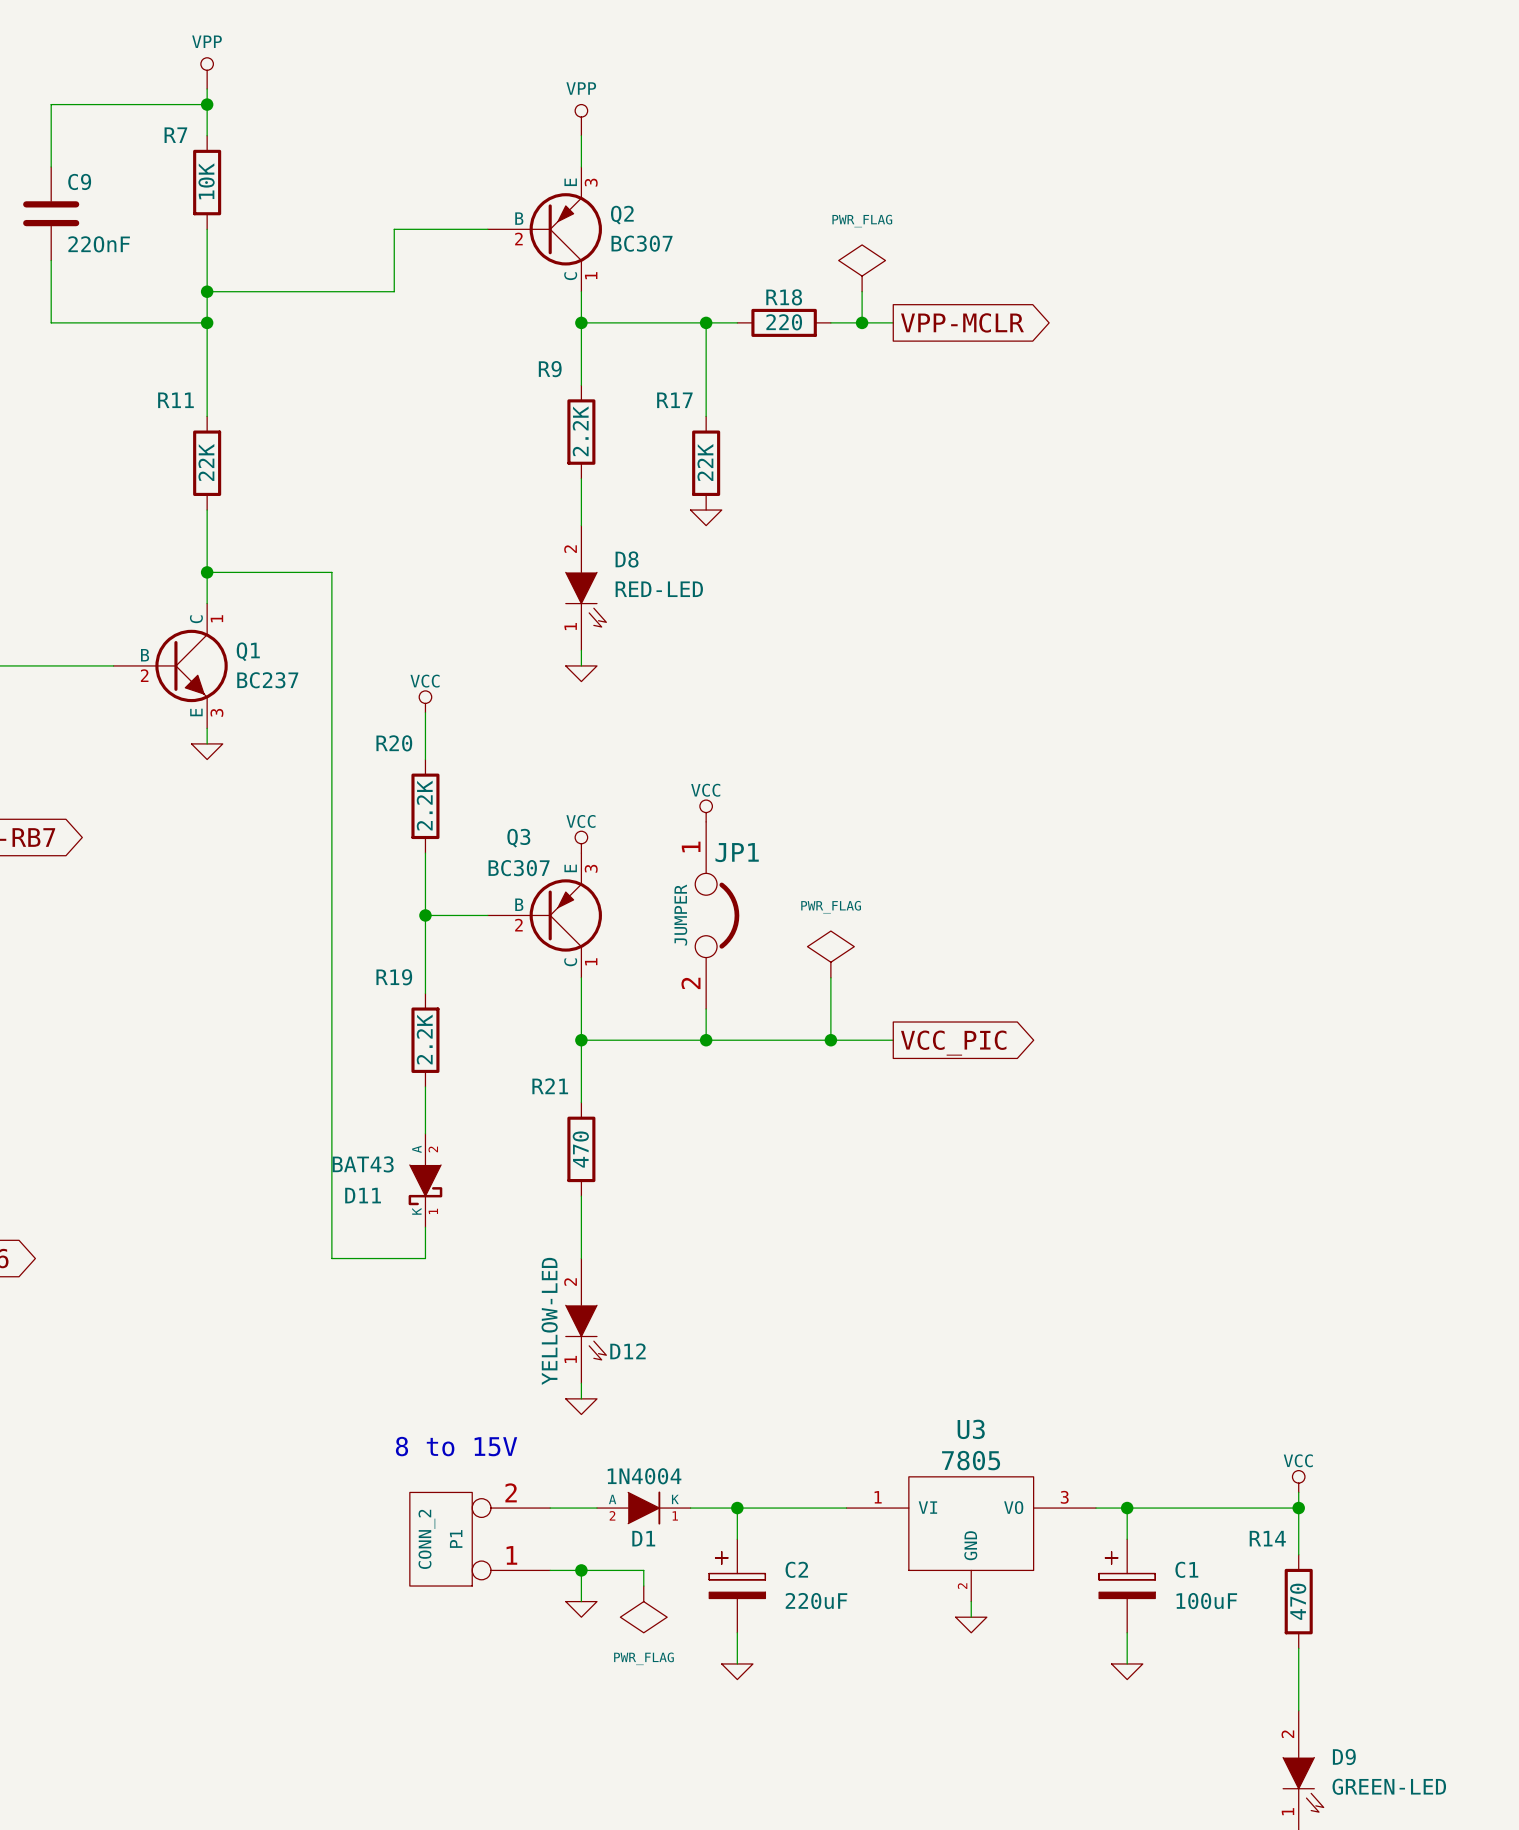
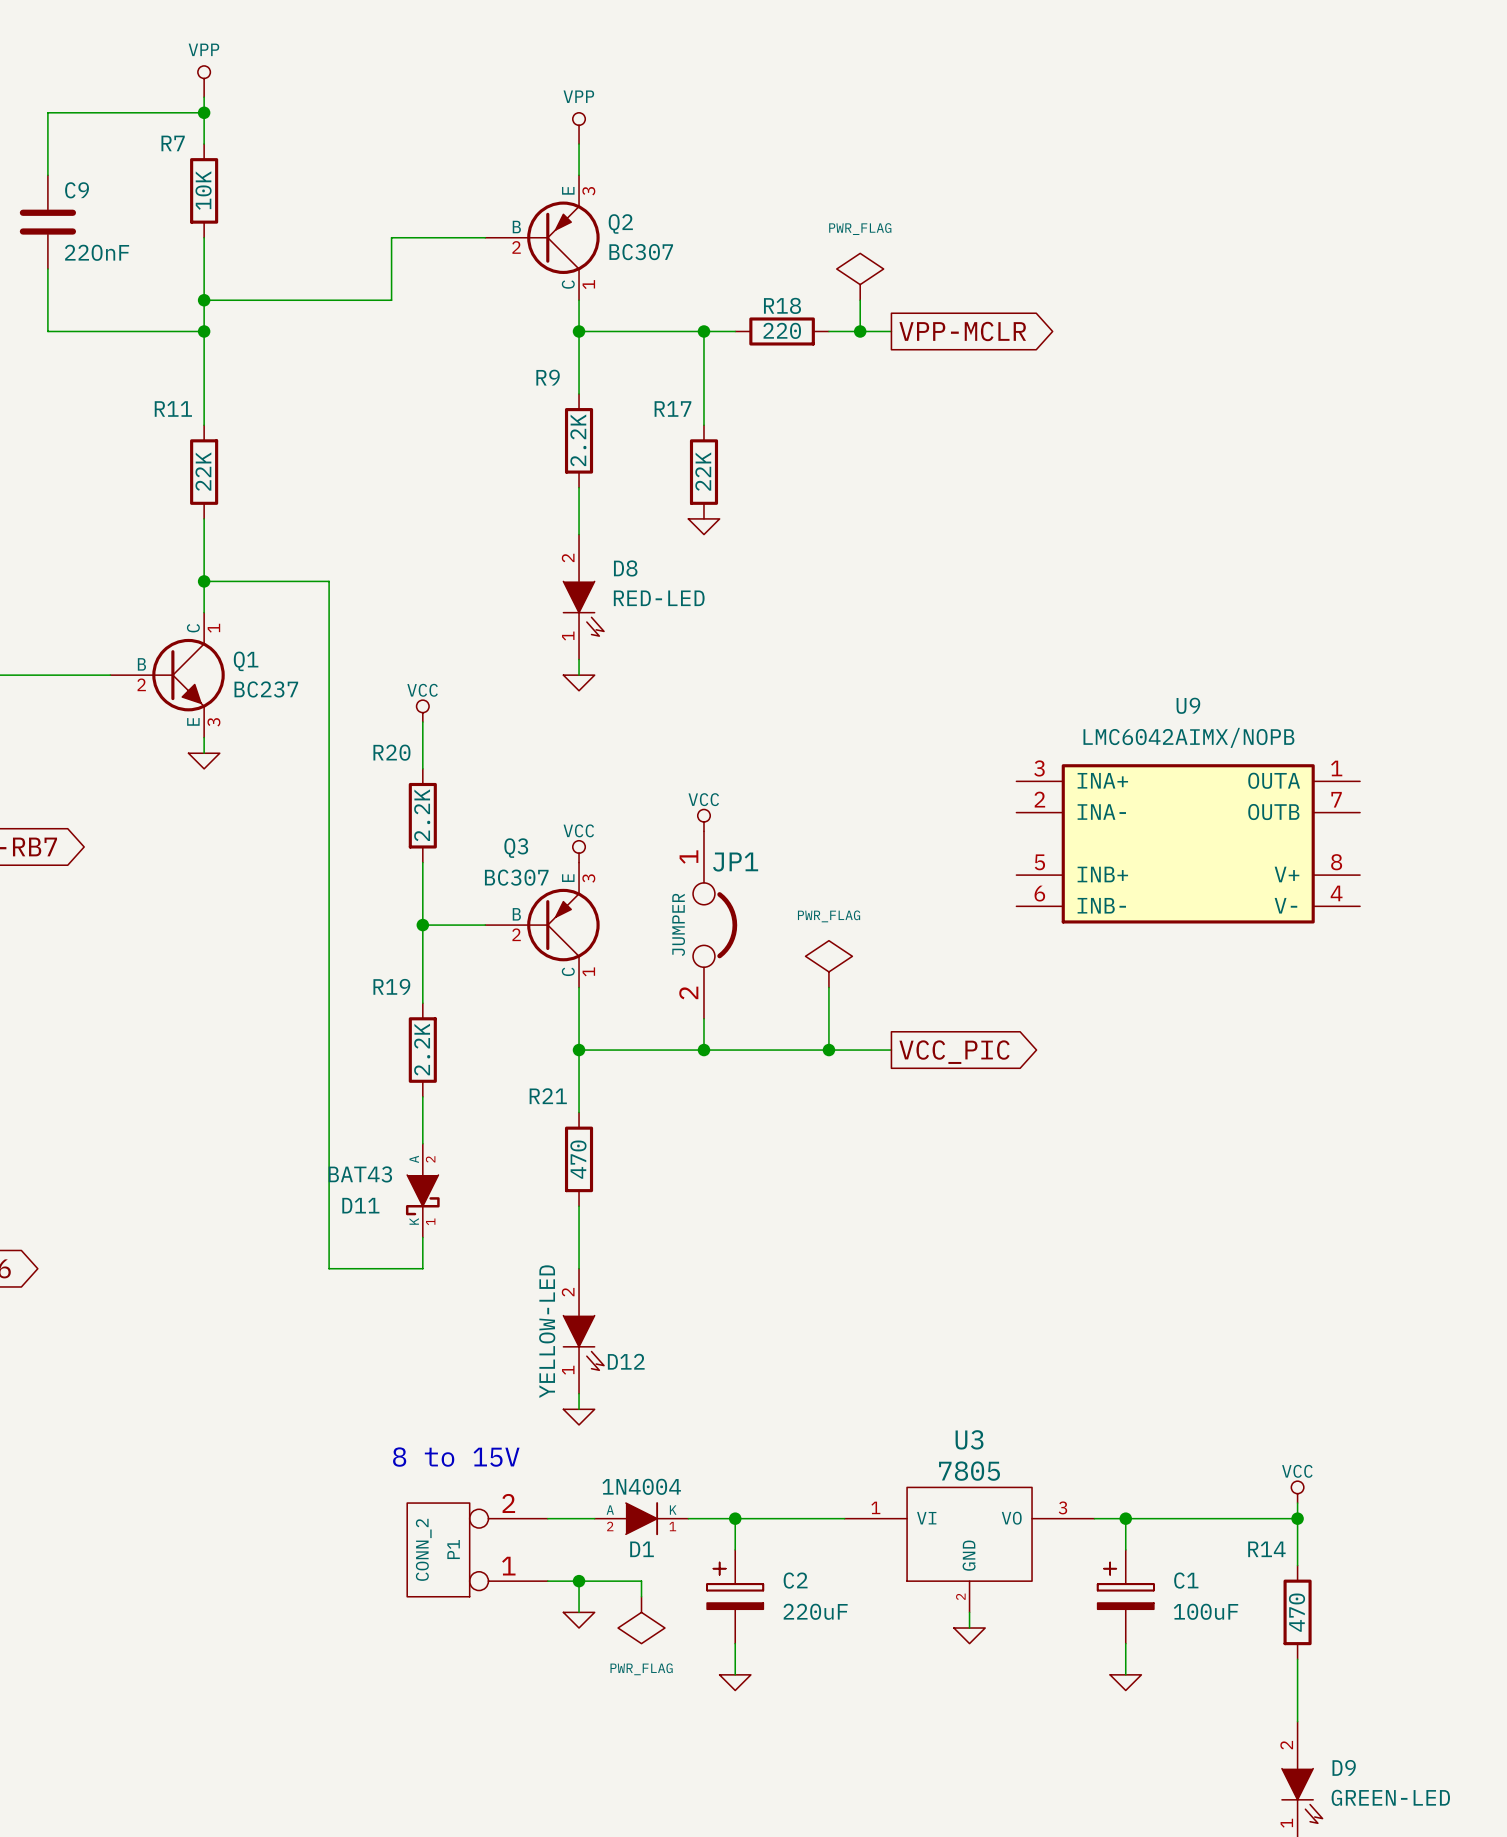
U9: none -> LMC6042AIMX/NOPB (1188, 843)

